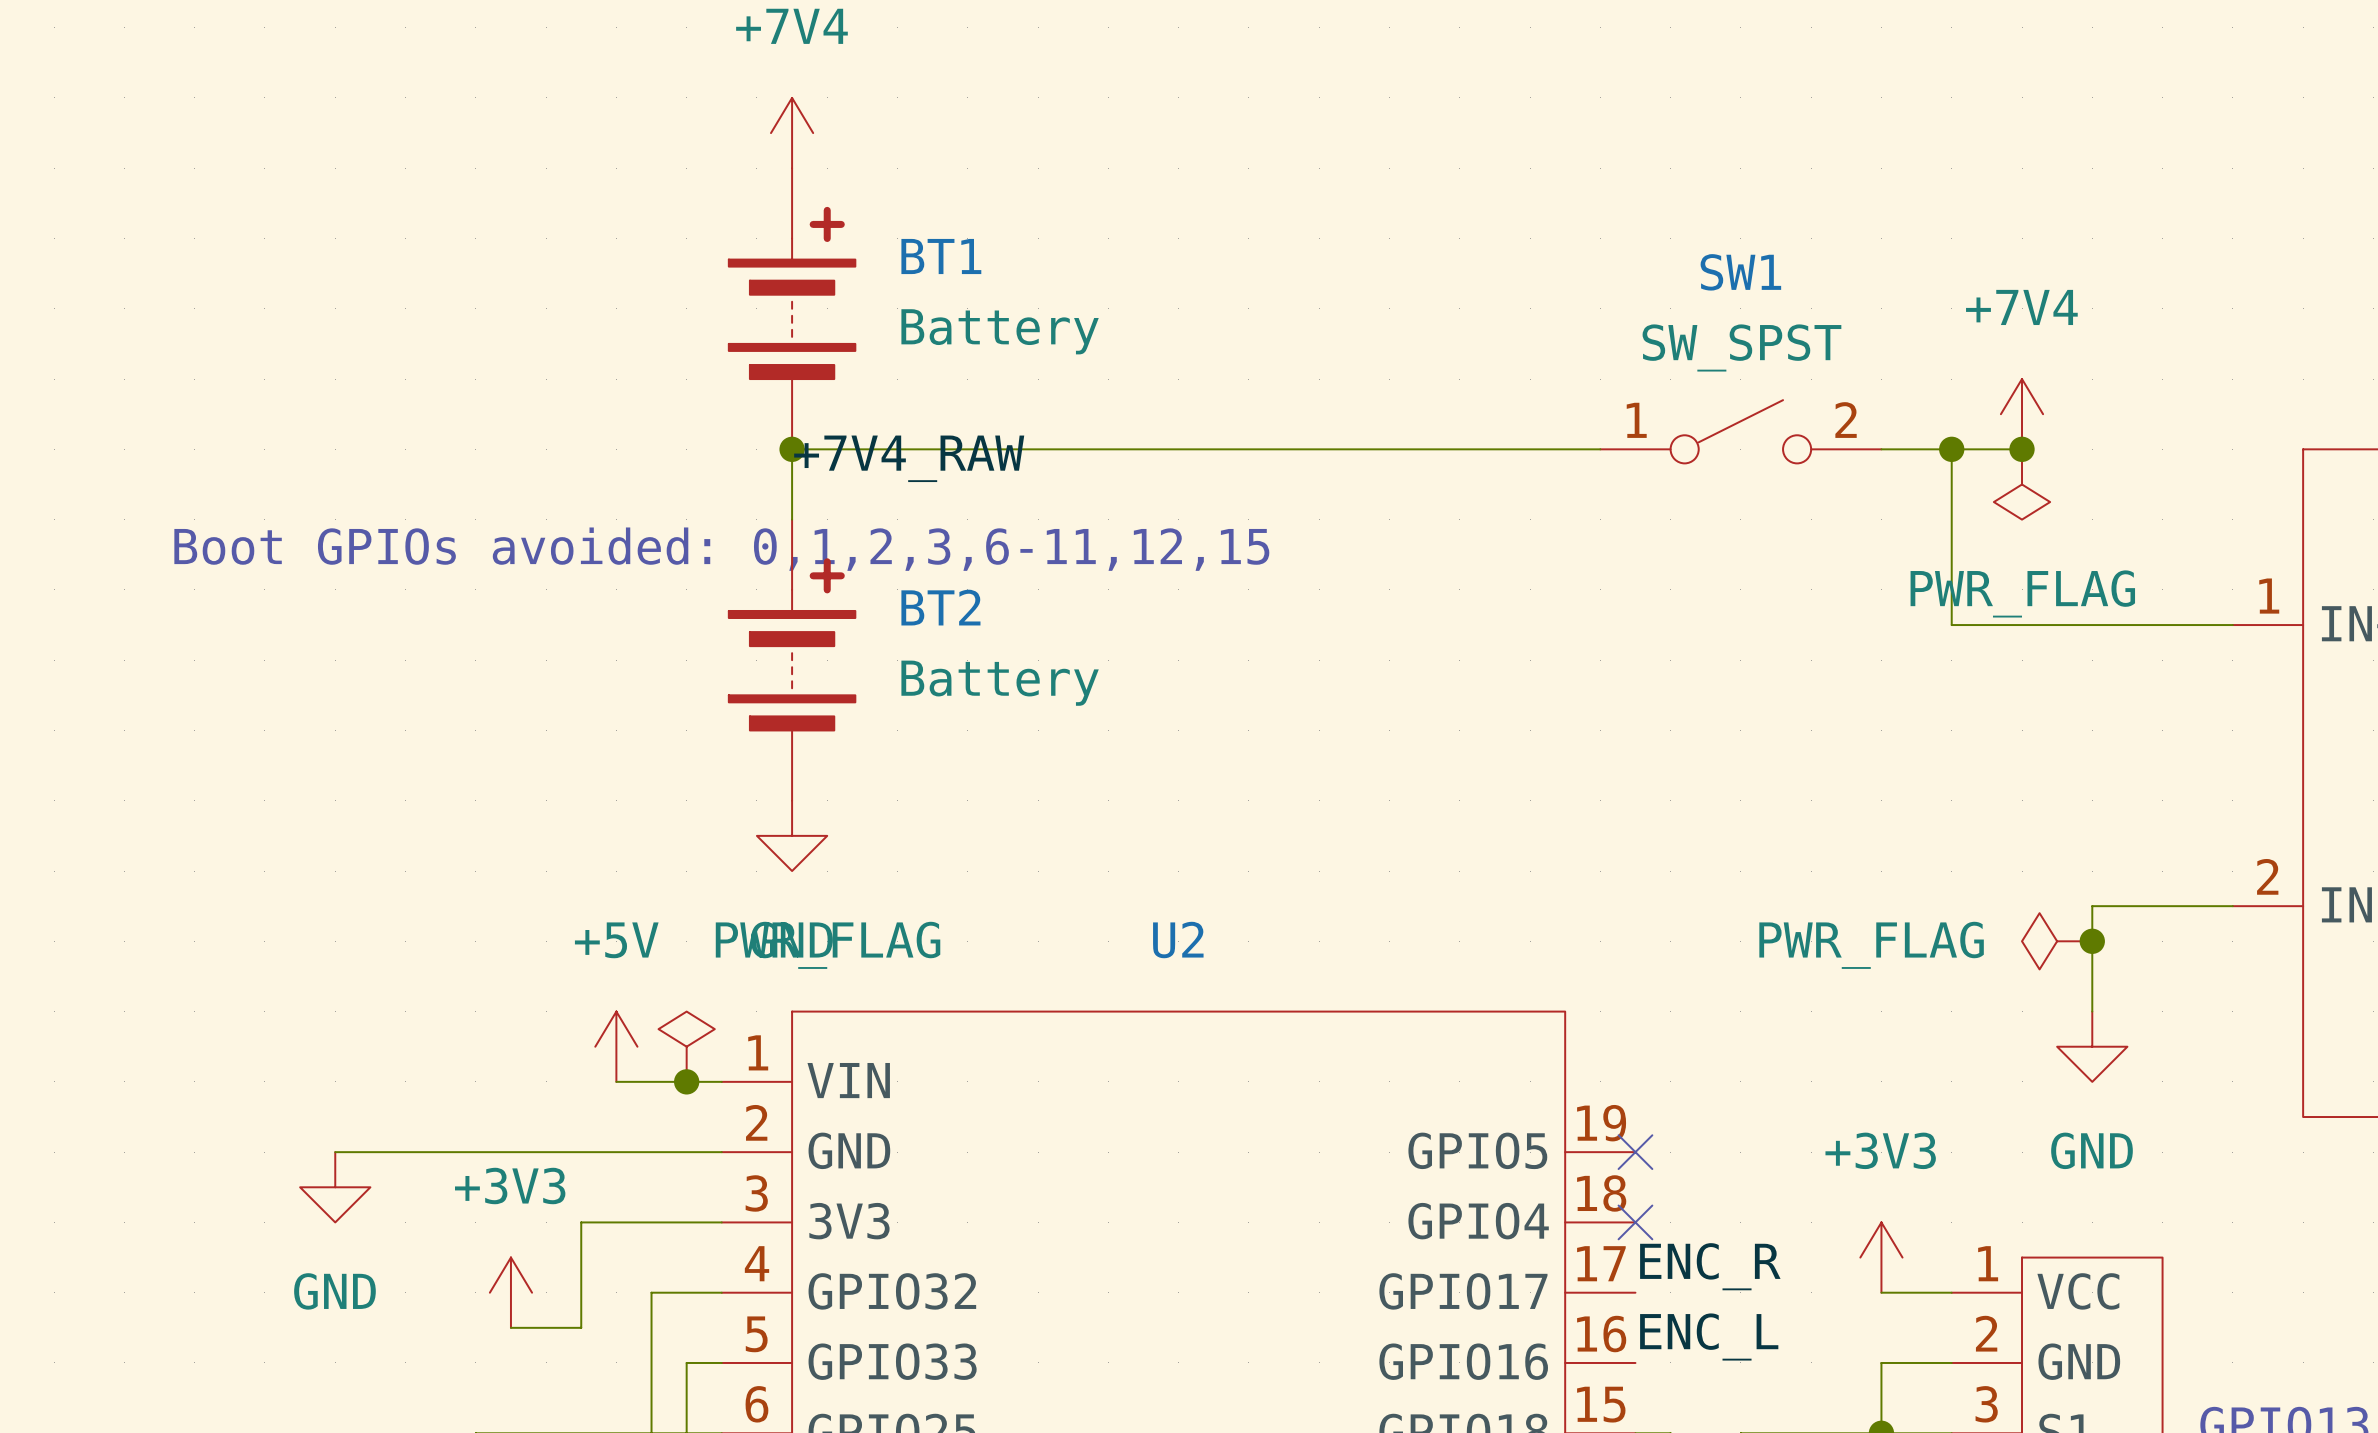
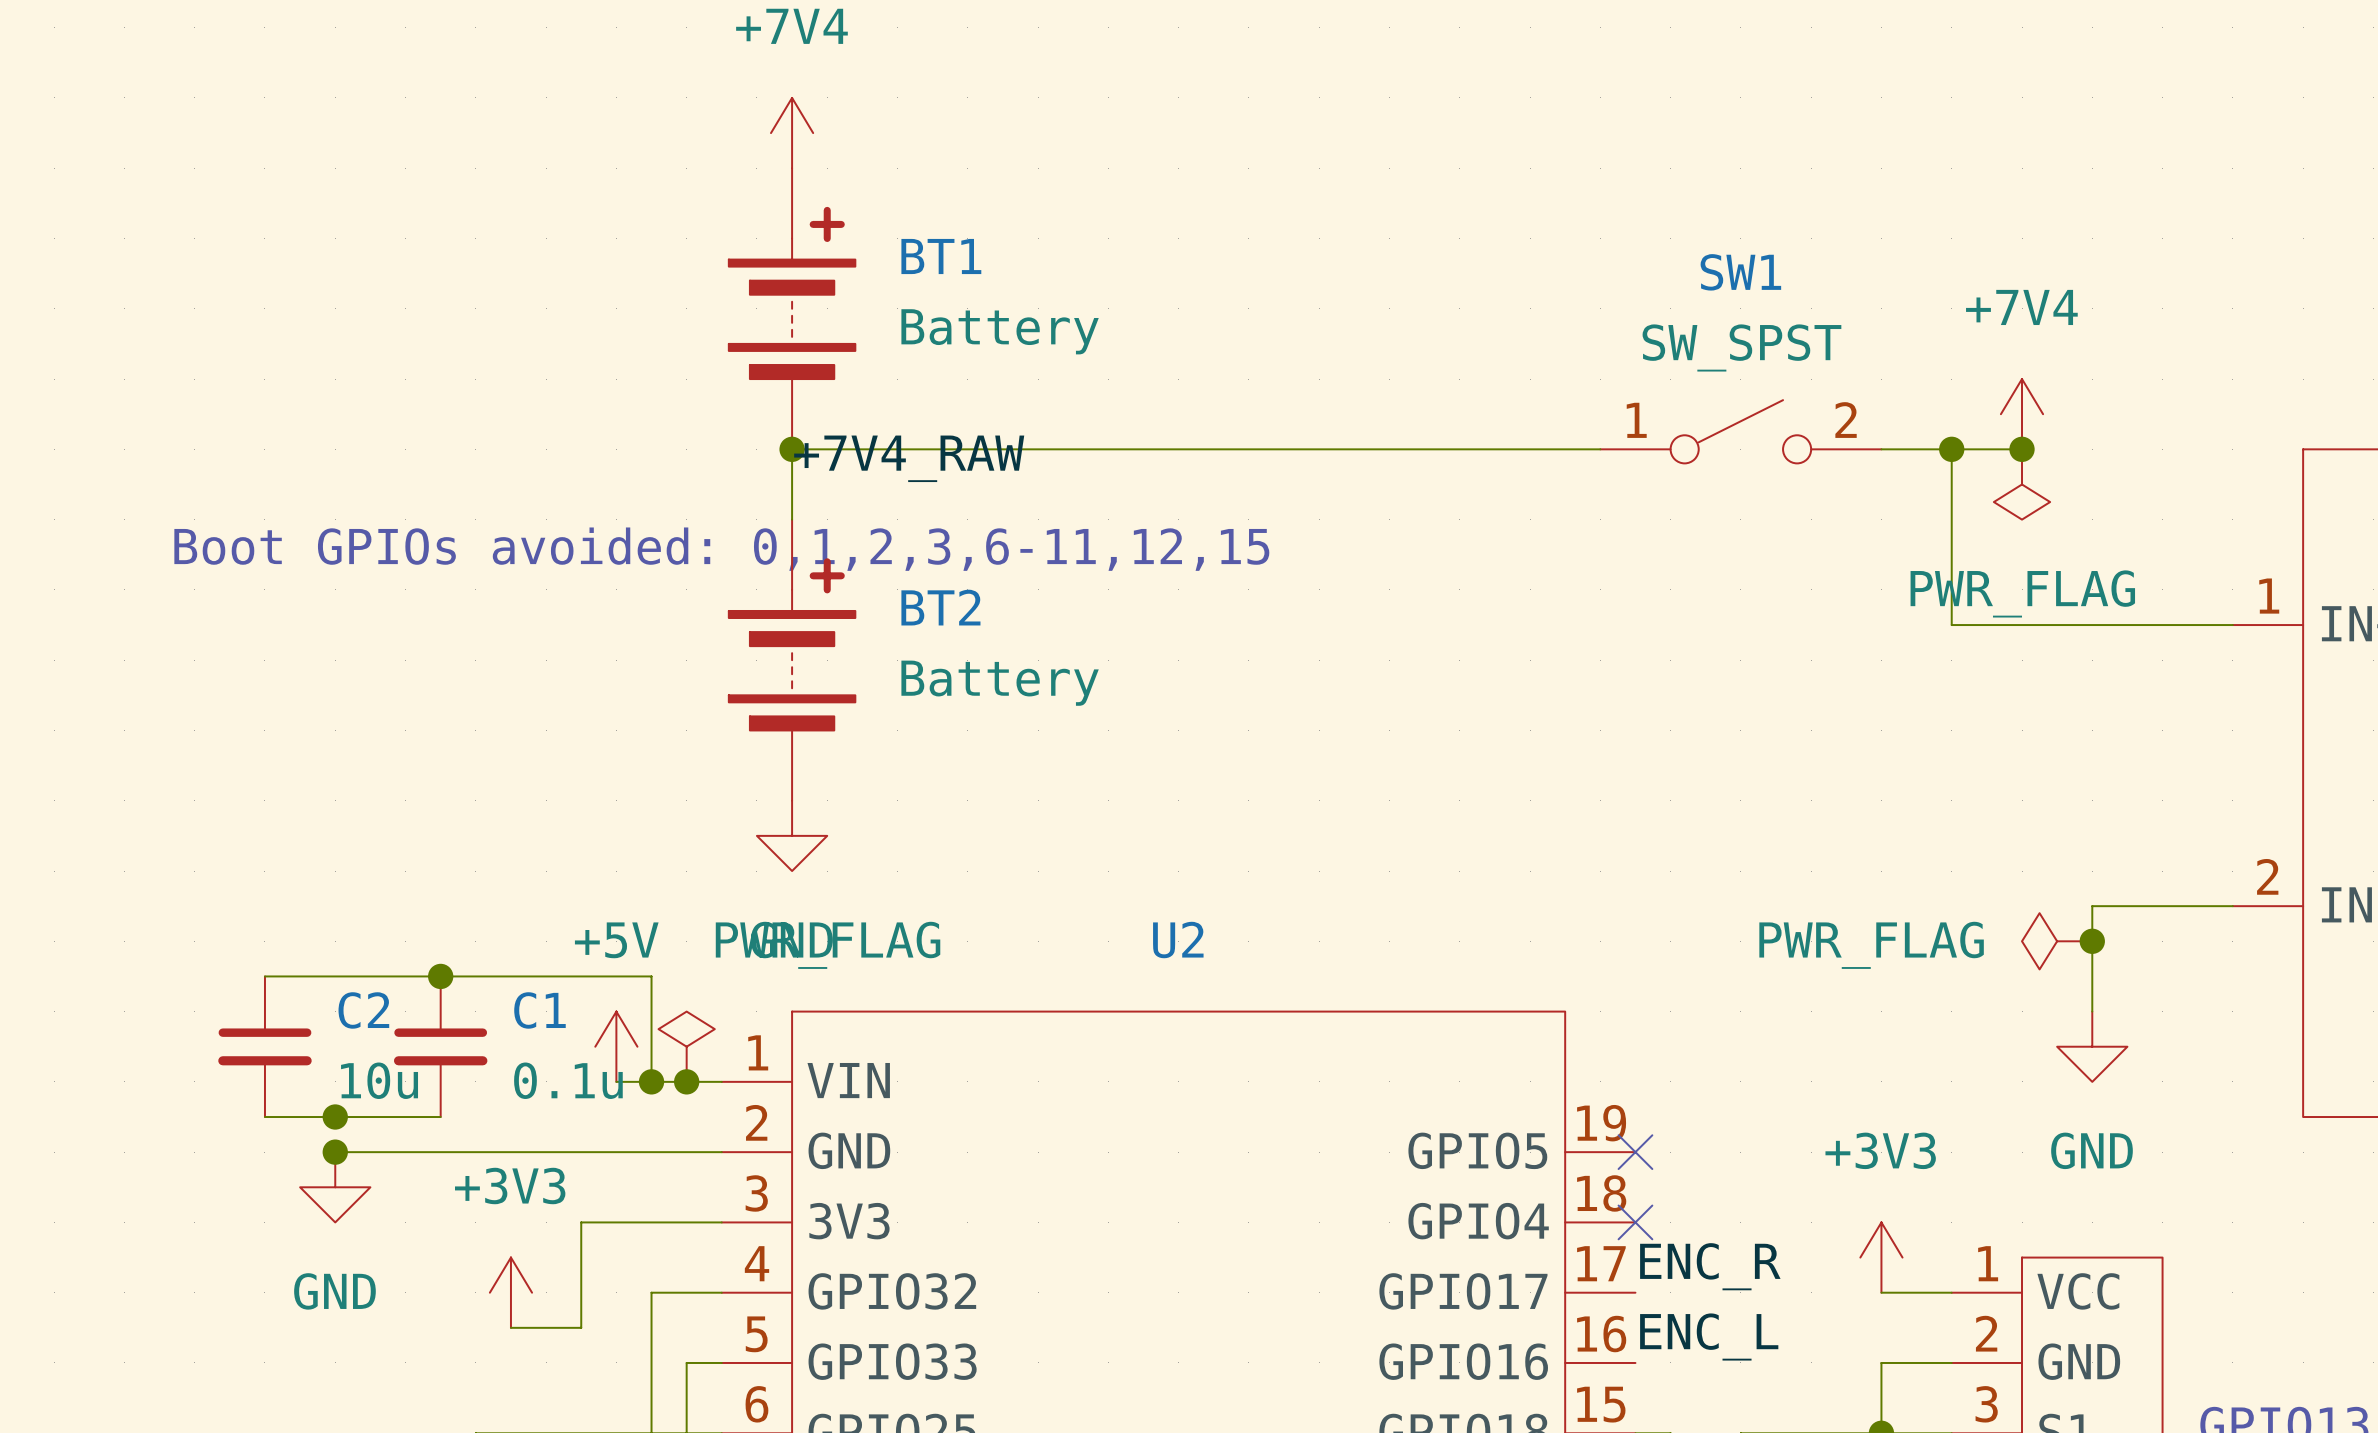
wire: none -> (264, 976) (651, 976) (651, 1081)
junction: none -> (440, 976)
C2: none -> 10u (264, 1046)
C1: none -> 0.1u (440, 1046)
junction: none -> (651, 1081)
wire: none -> (264, 1117) (440, 1117)
junction: none -> (335, 1117)
junction: none -> (335, 1152)

